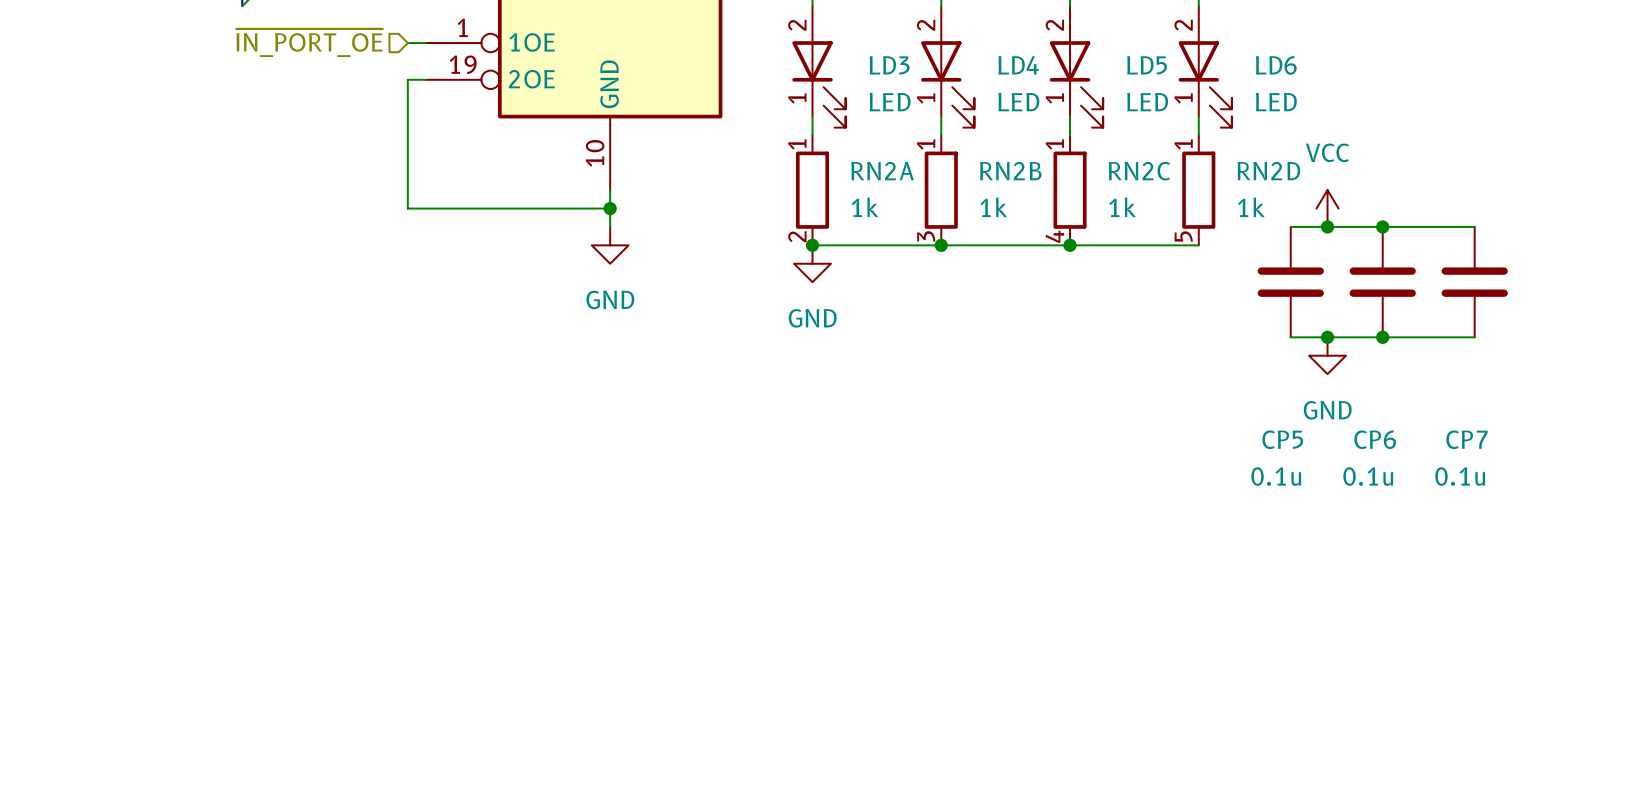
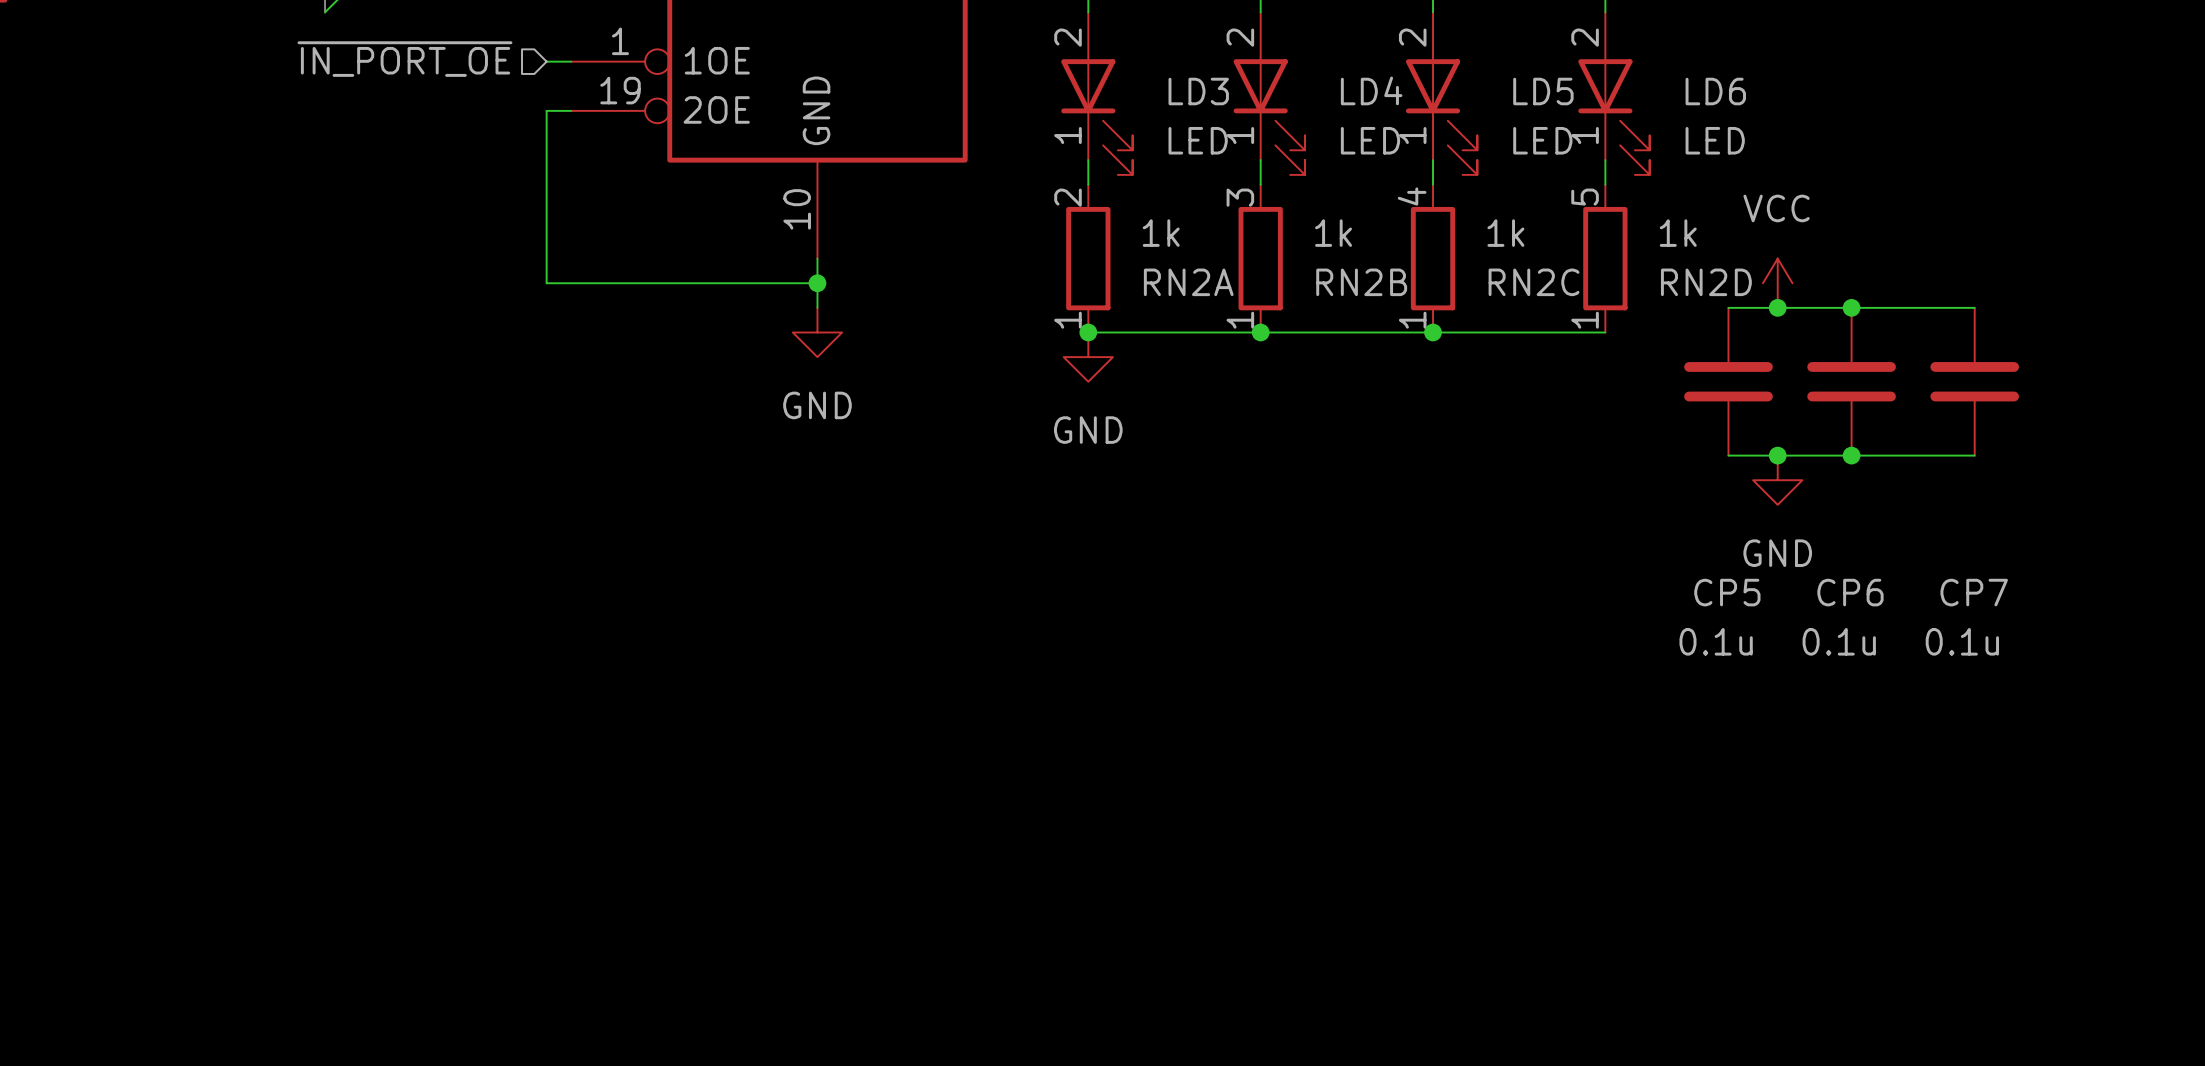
RN2A name position: RN2A (882, 171) -> RN2A (1188, 282)
RN2B name position: RN2B (1010, 171) -> RN2B (1361, 282)
RN2C name position: RN2C (1139, 171) -> RN2C (1534, 282)
RN2D name position: RN2D (1268, 171) -> RN2D (1706, 282)
RN2A rotation: 0° (812, 190) -> 180° (1088, 258)
RN2B rotation: 0° (941, 190) -> 180° (1260, 258)
RN2C rotation: 0° (1070, 190) -> 180° (1433, 258)
RN2D rotation: 0° (1198, 190) -> 180° (1605, 258)
RN2A value position: 1k (865, 207) -> 1k (1161, 233)
RN2B value position: 1k (993, 207) -> 1k (1333, 233)
RN2C value position: 1k (1122, 207) -> 1k (1505, 233)
RN2D value position: 1k (1251, 207) -> 1k (1678, 233)

